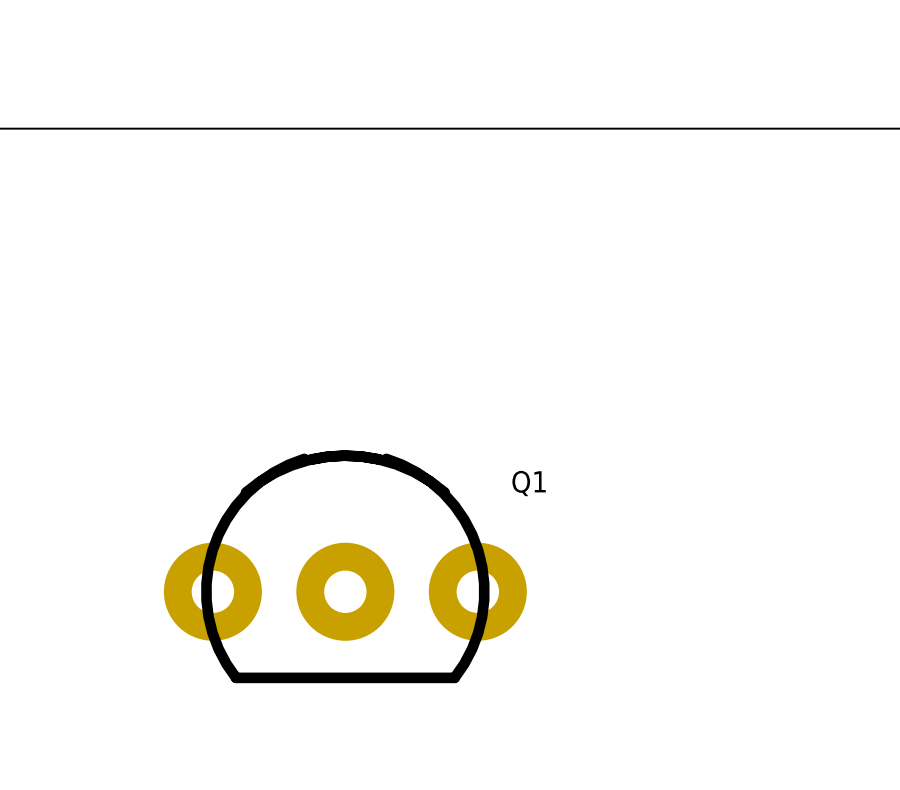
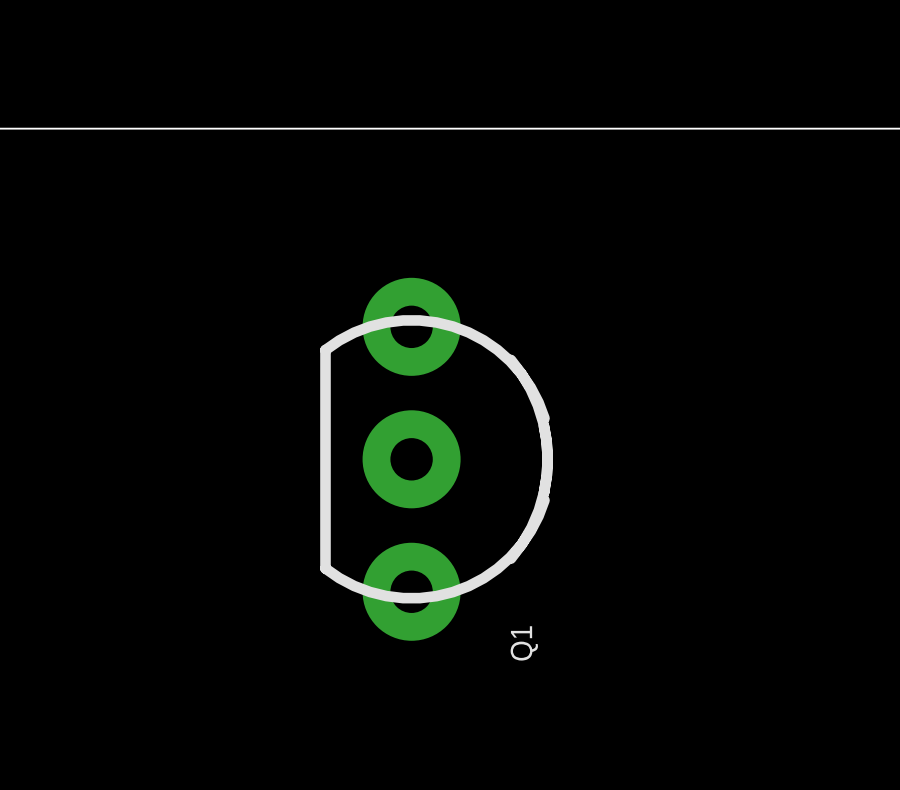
Q1 rotation: 0° (345, 566) -> 90° clockwise (436, 459)

